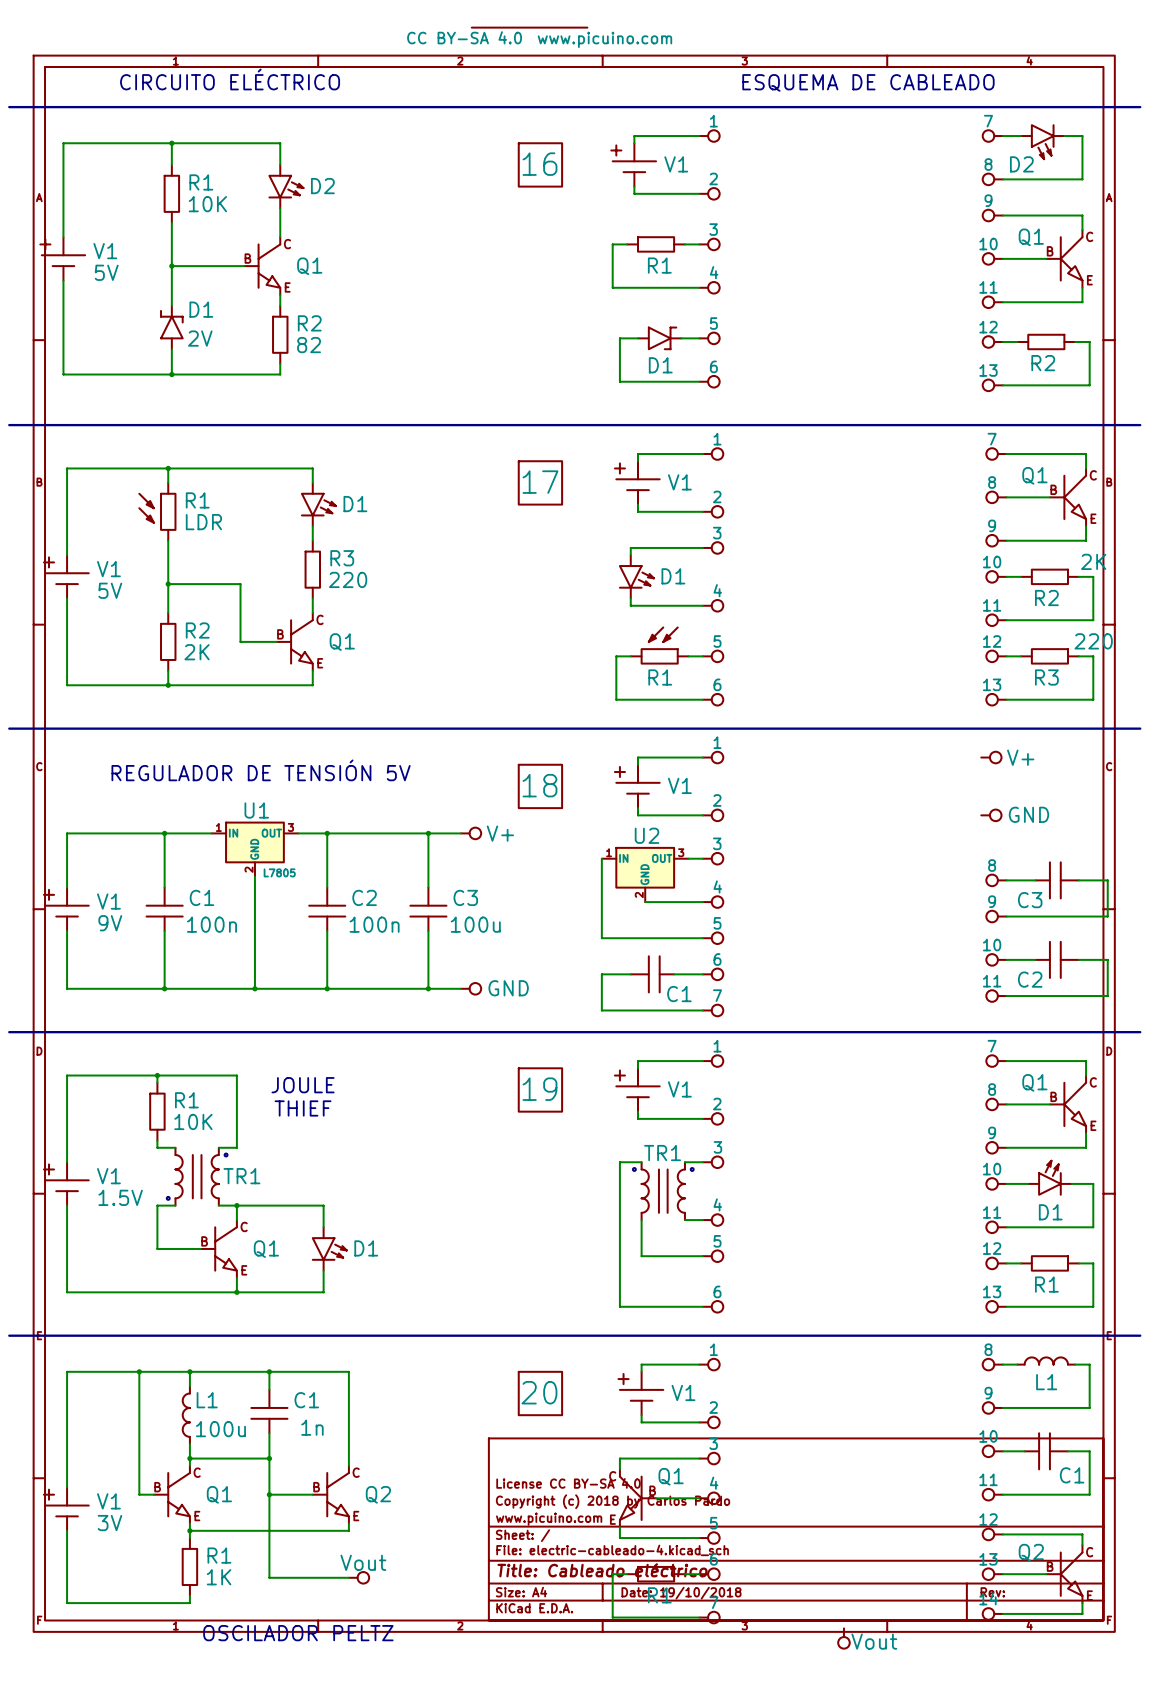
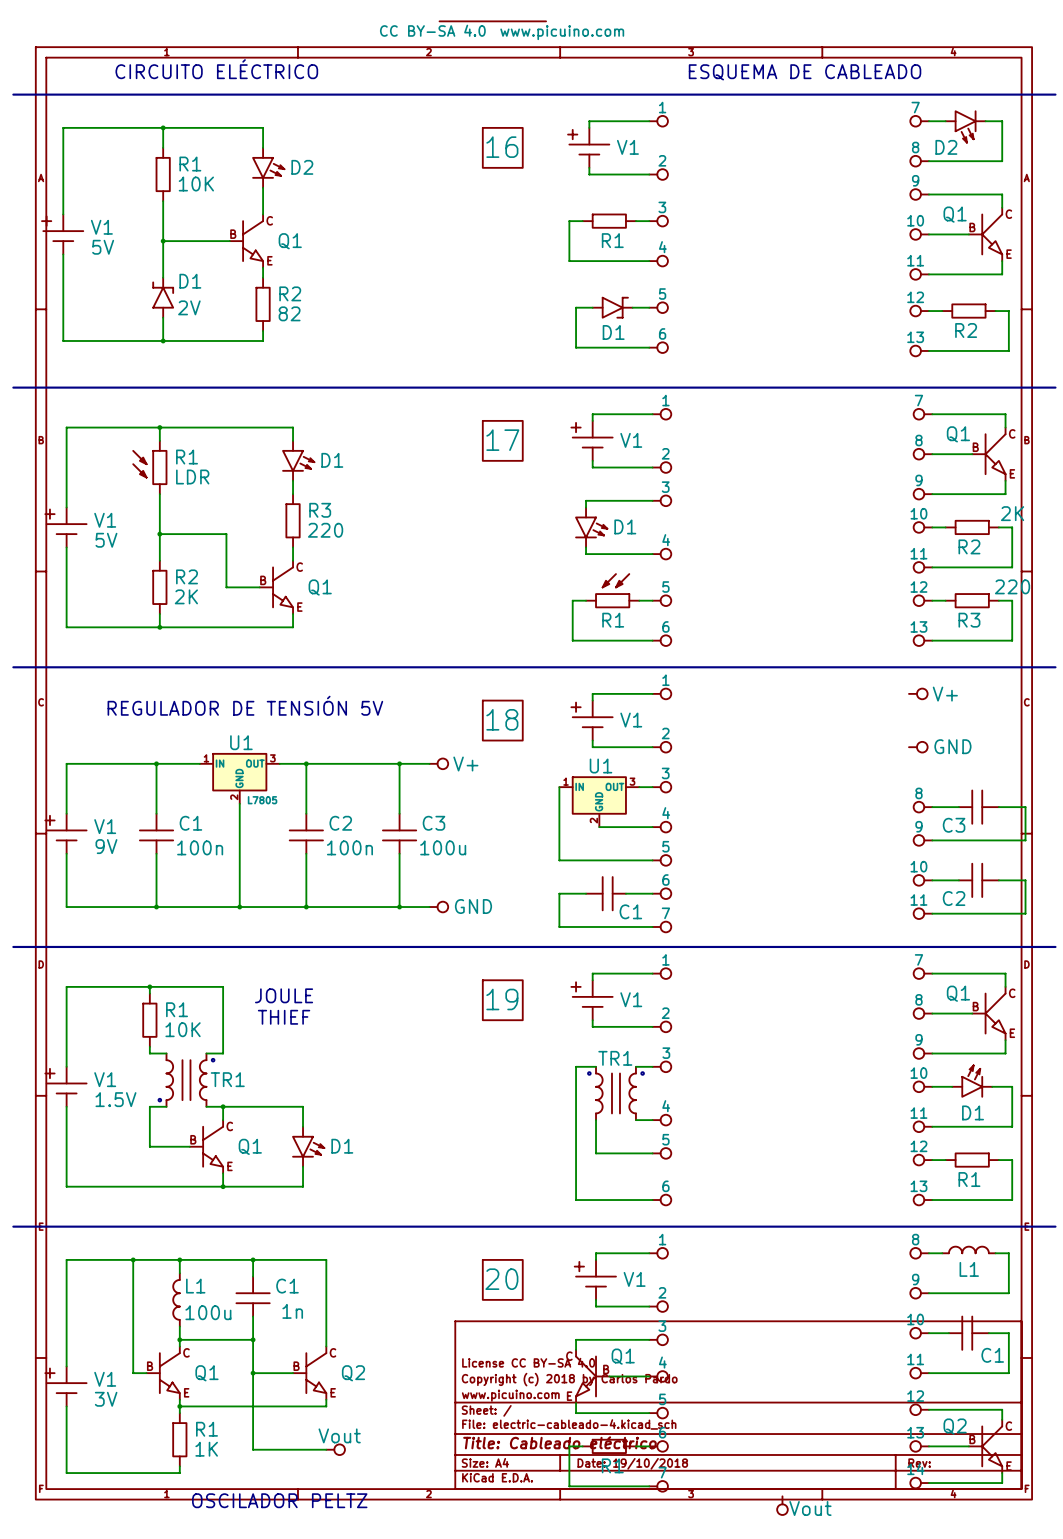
U2 name: U2 (647, 835) -> U1 (600, 766)

